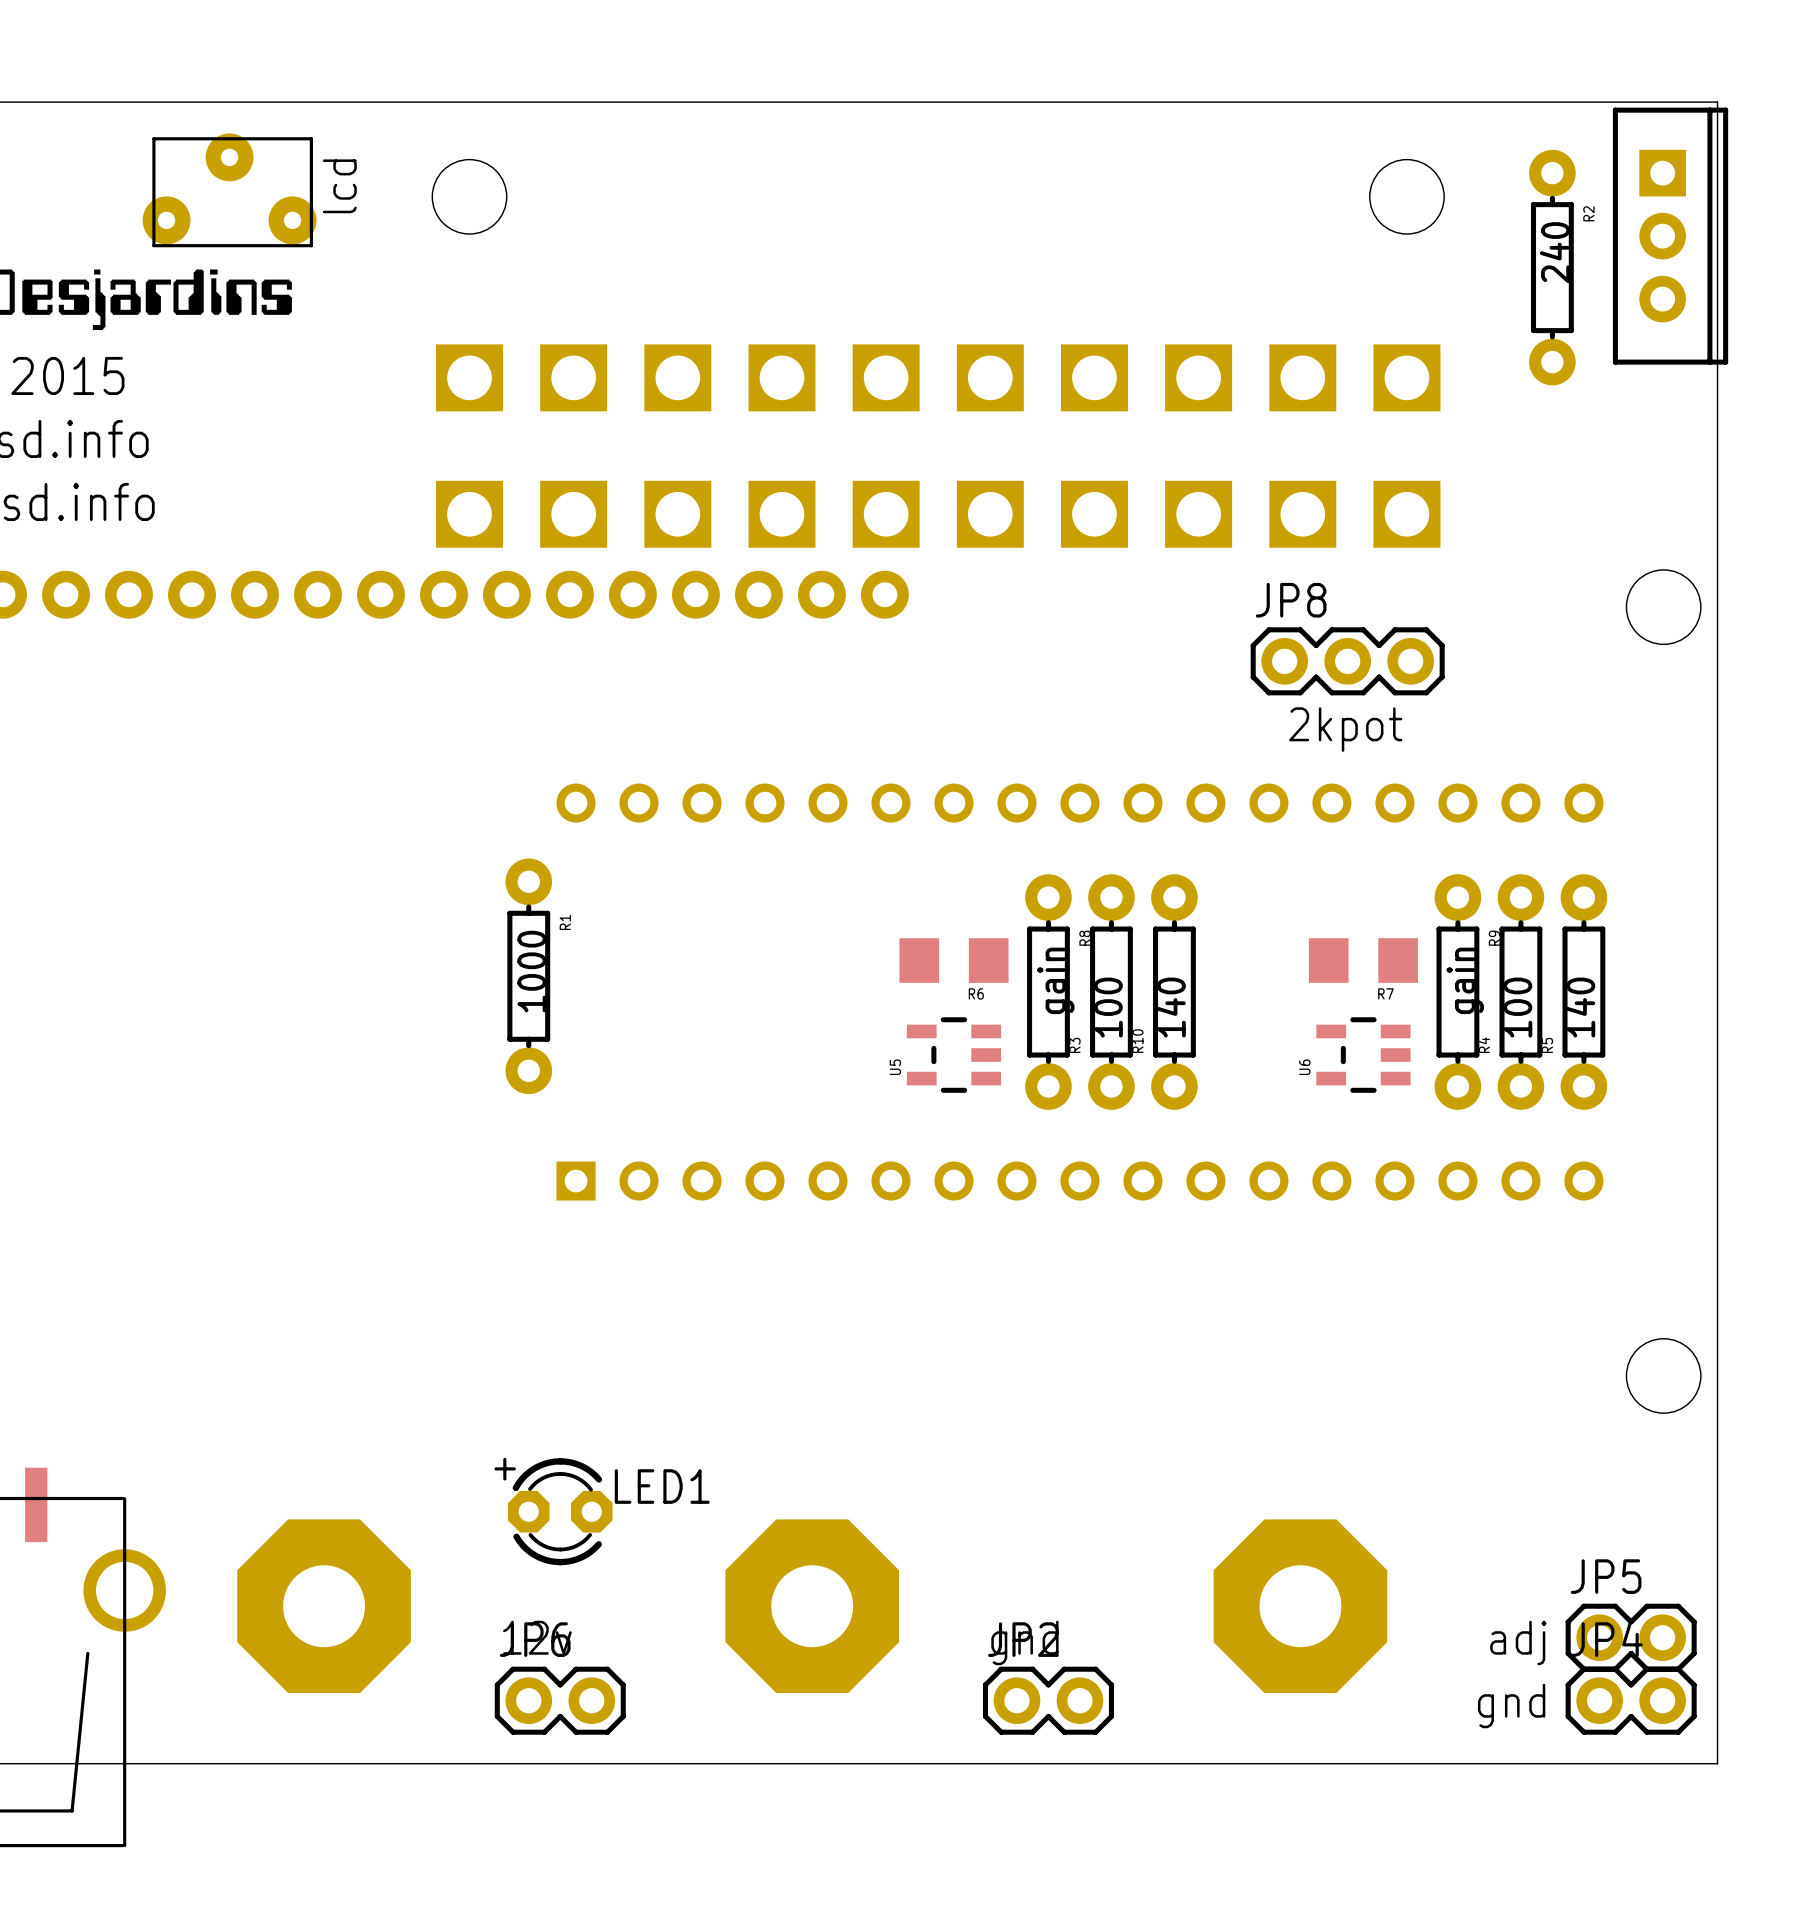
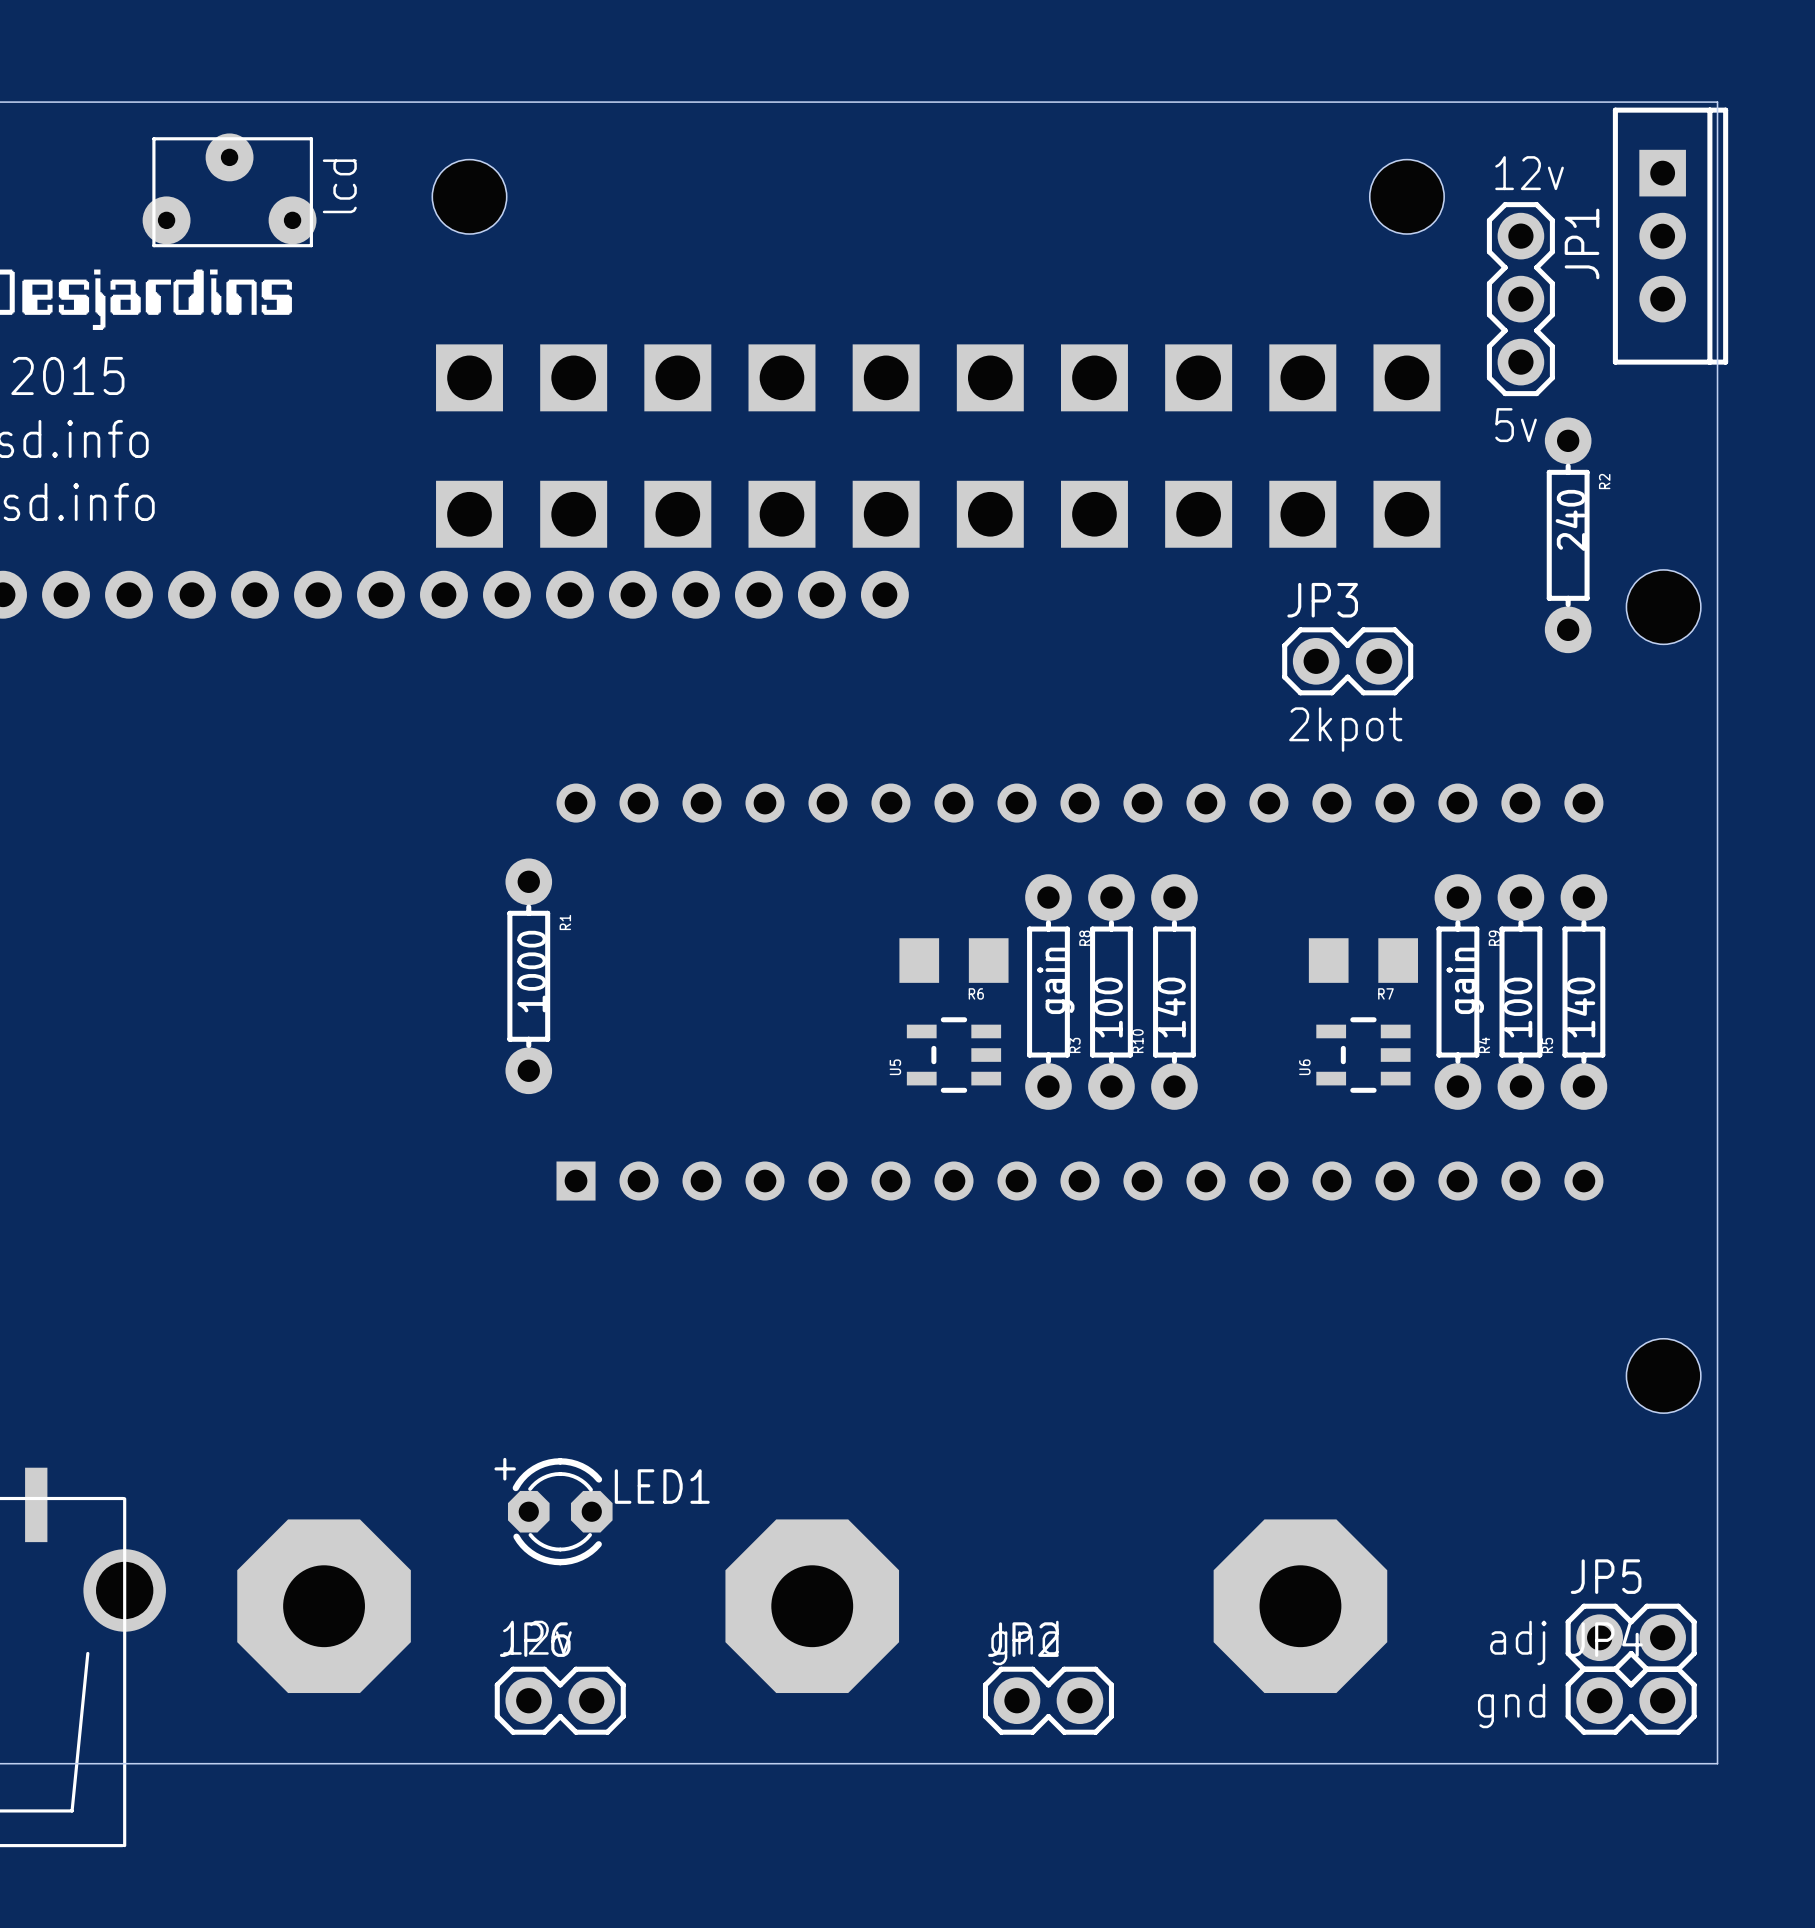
text: none -> 12v (1529, 173)
R2 position: (1552, 267) -> (1568, 535)
JP1: none -> (1520, 299)
text: none -> 5v (1516, 425)
JP8: (1347, 661) -> none
JP3: none -> (1347, 661)

